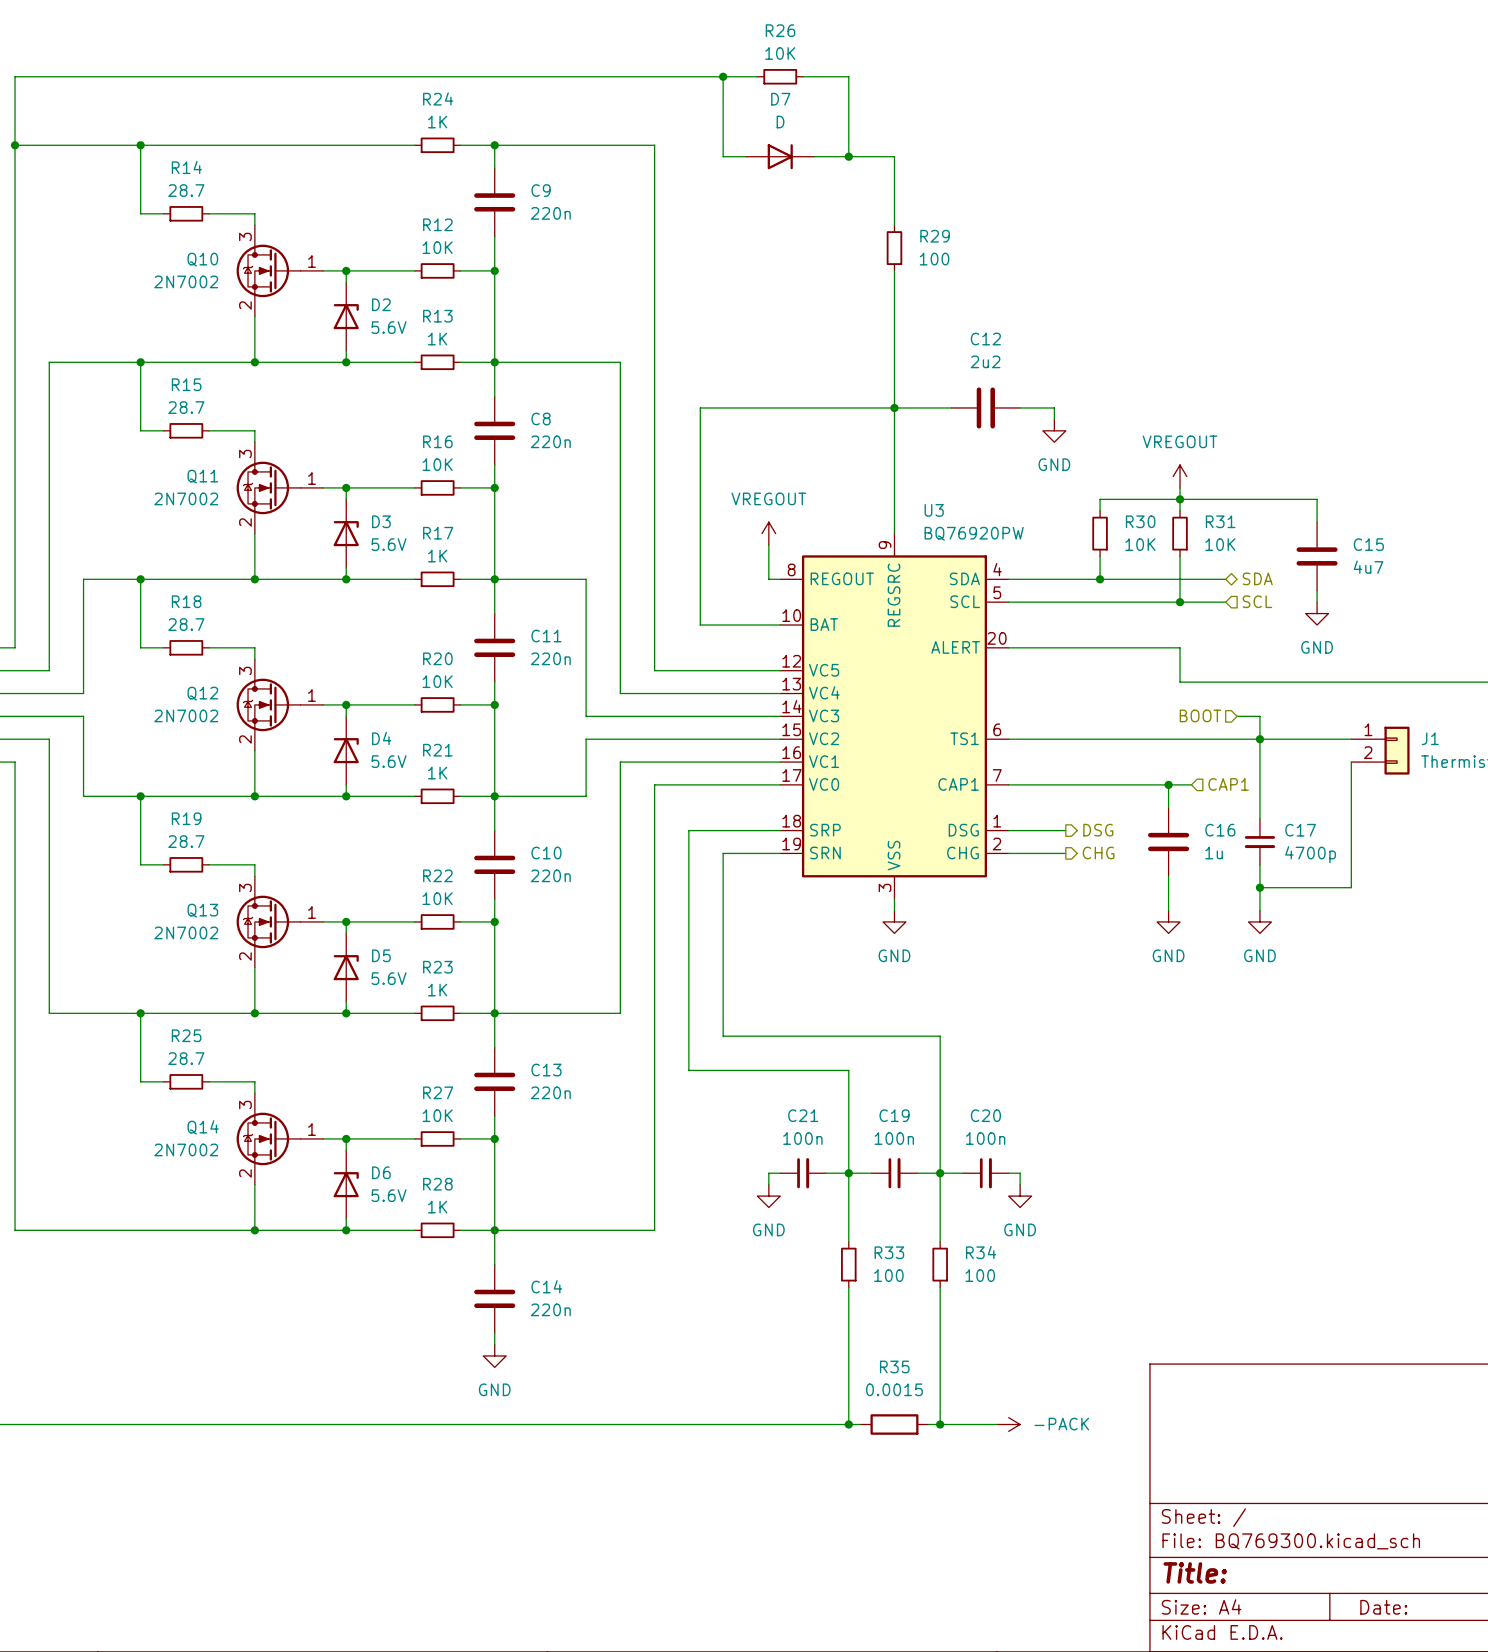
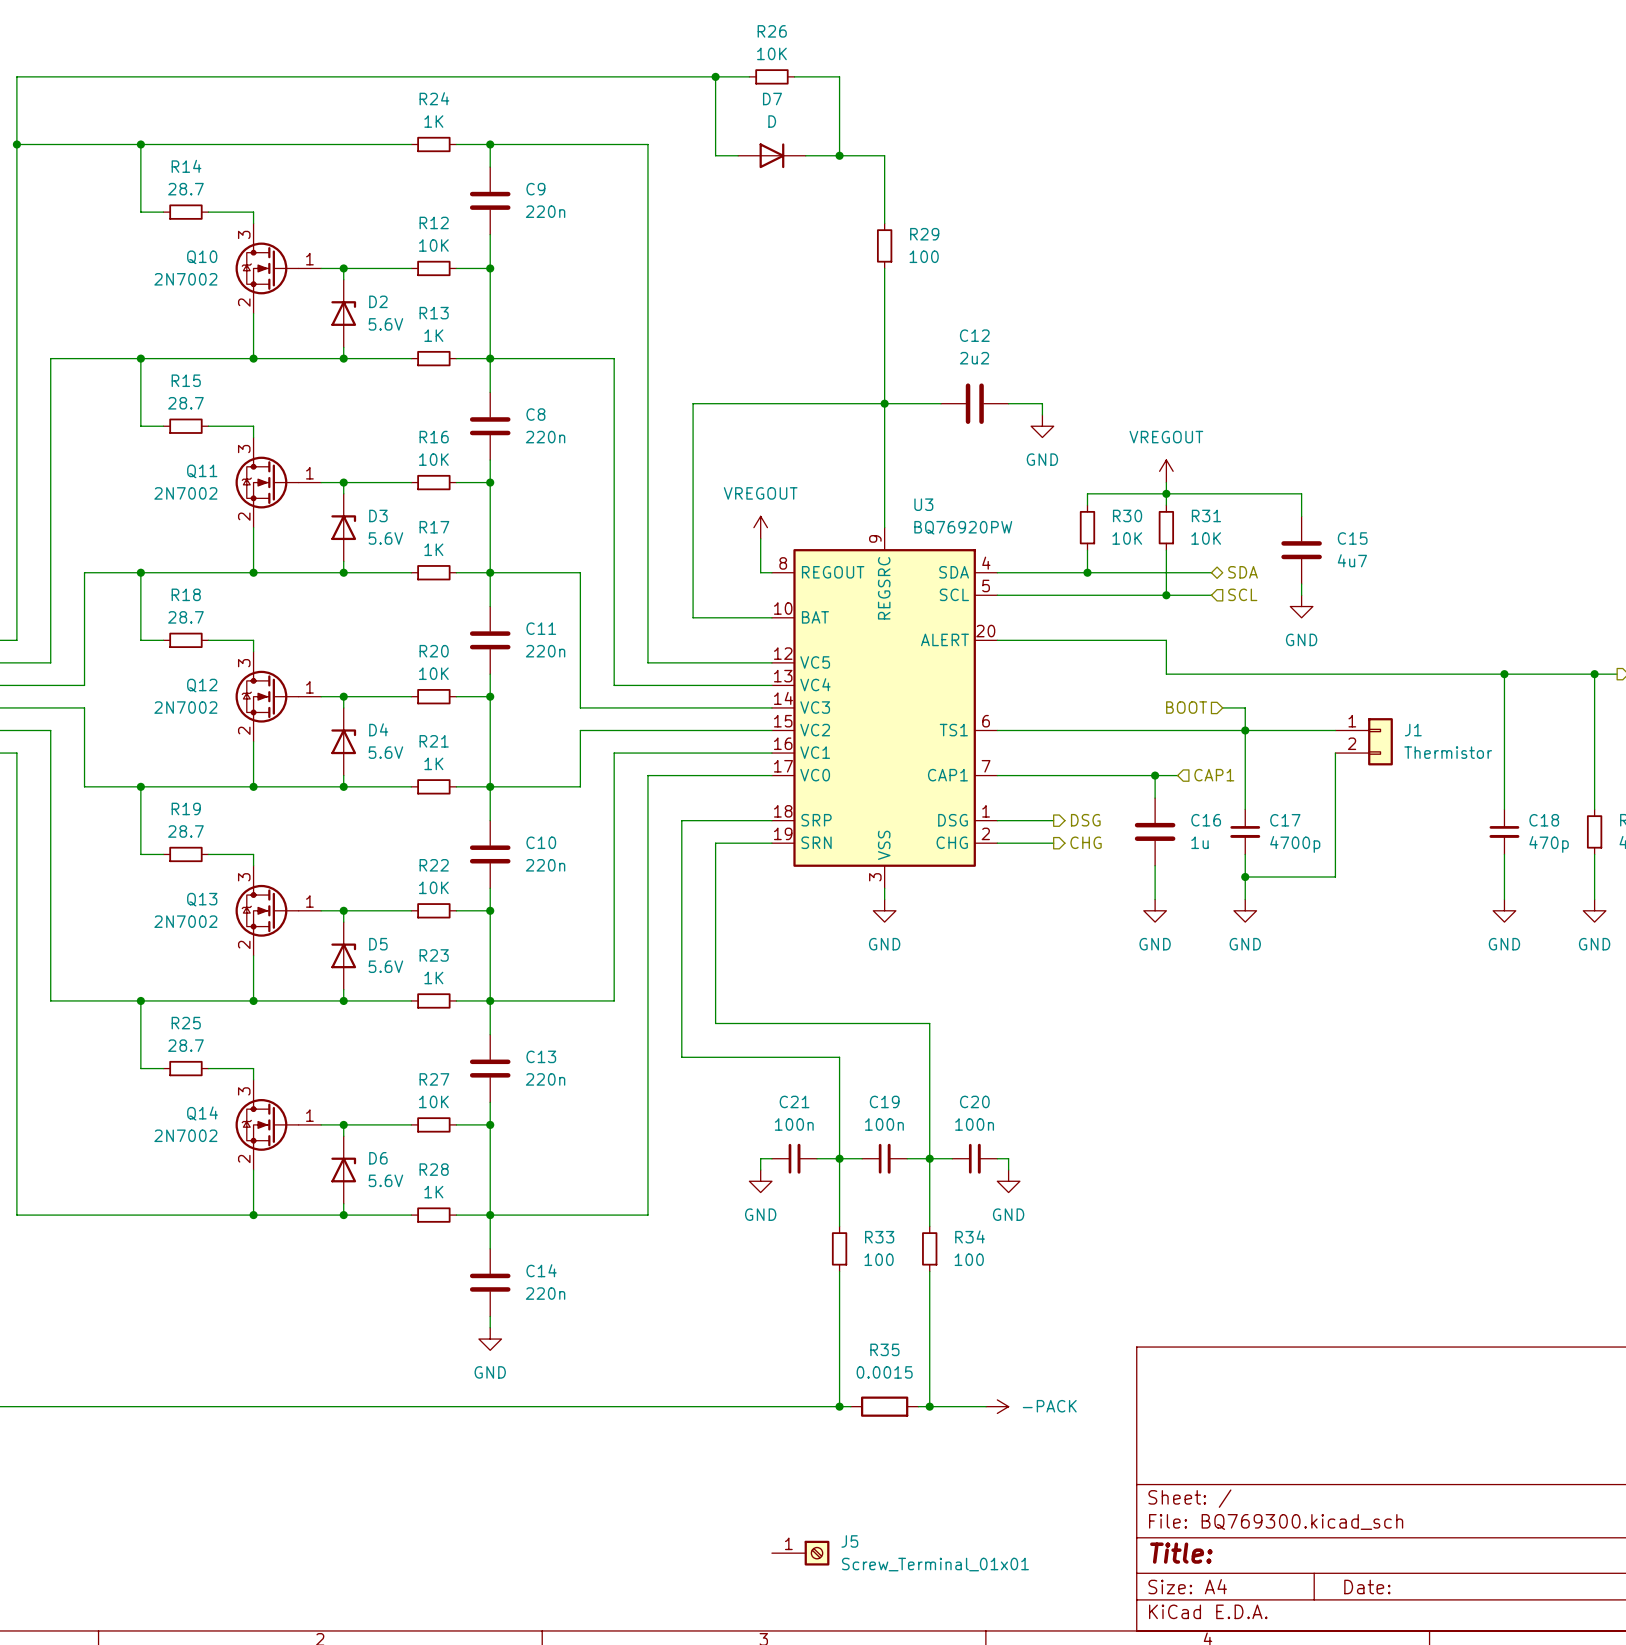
J5: none -> Screw_Terminal_01x01 (800, 1553)

